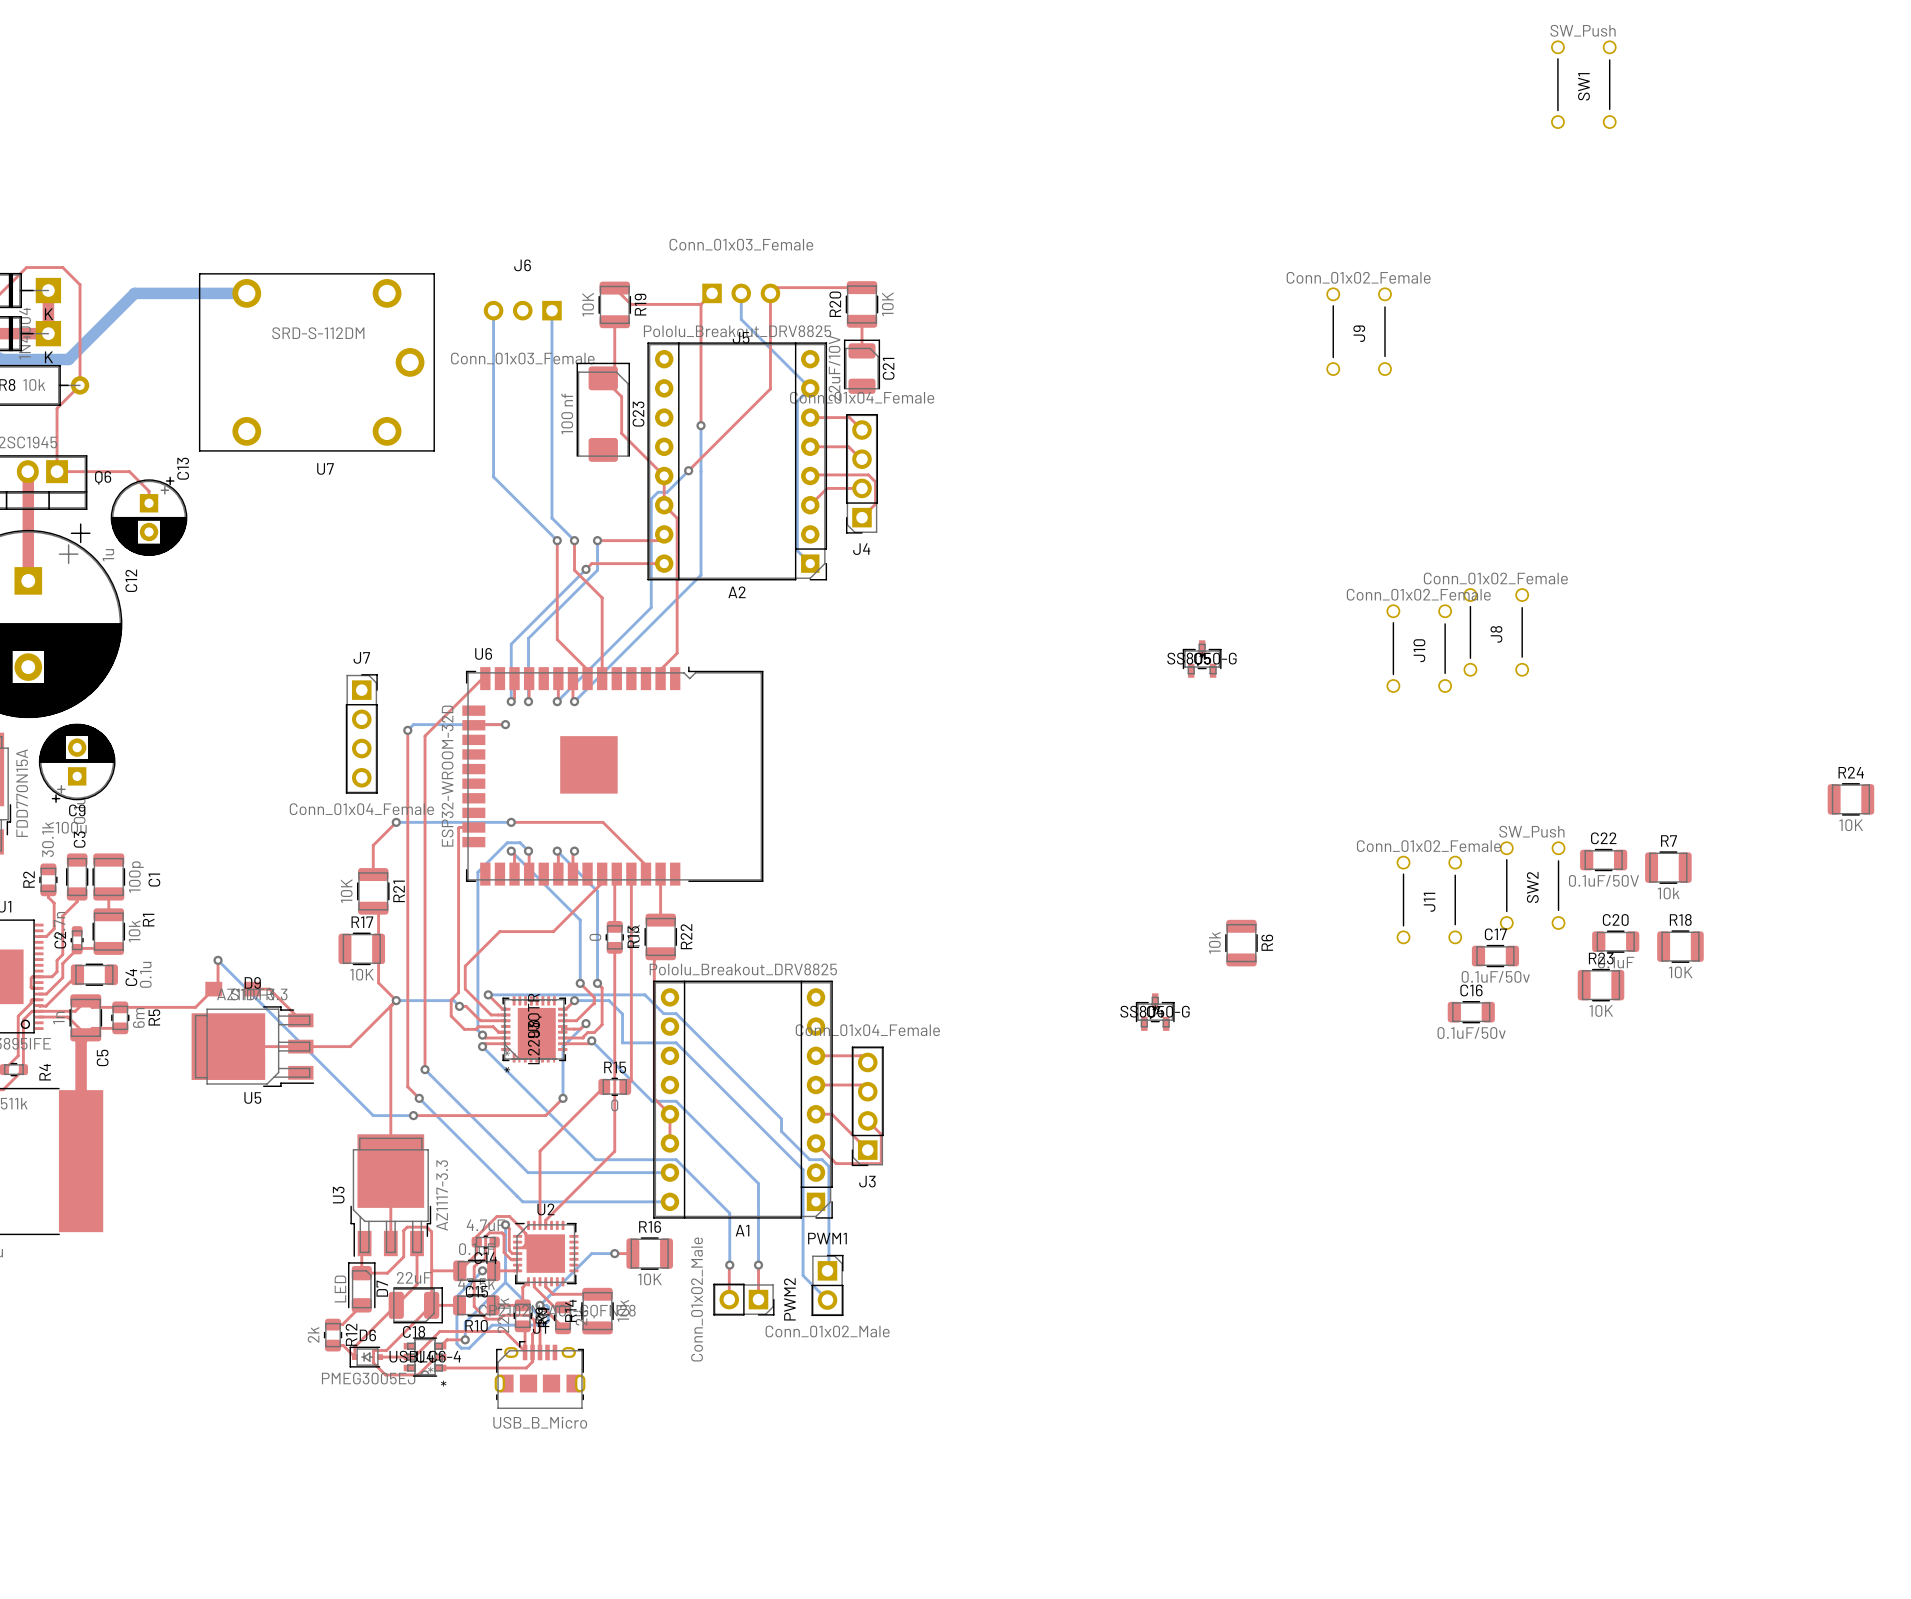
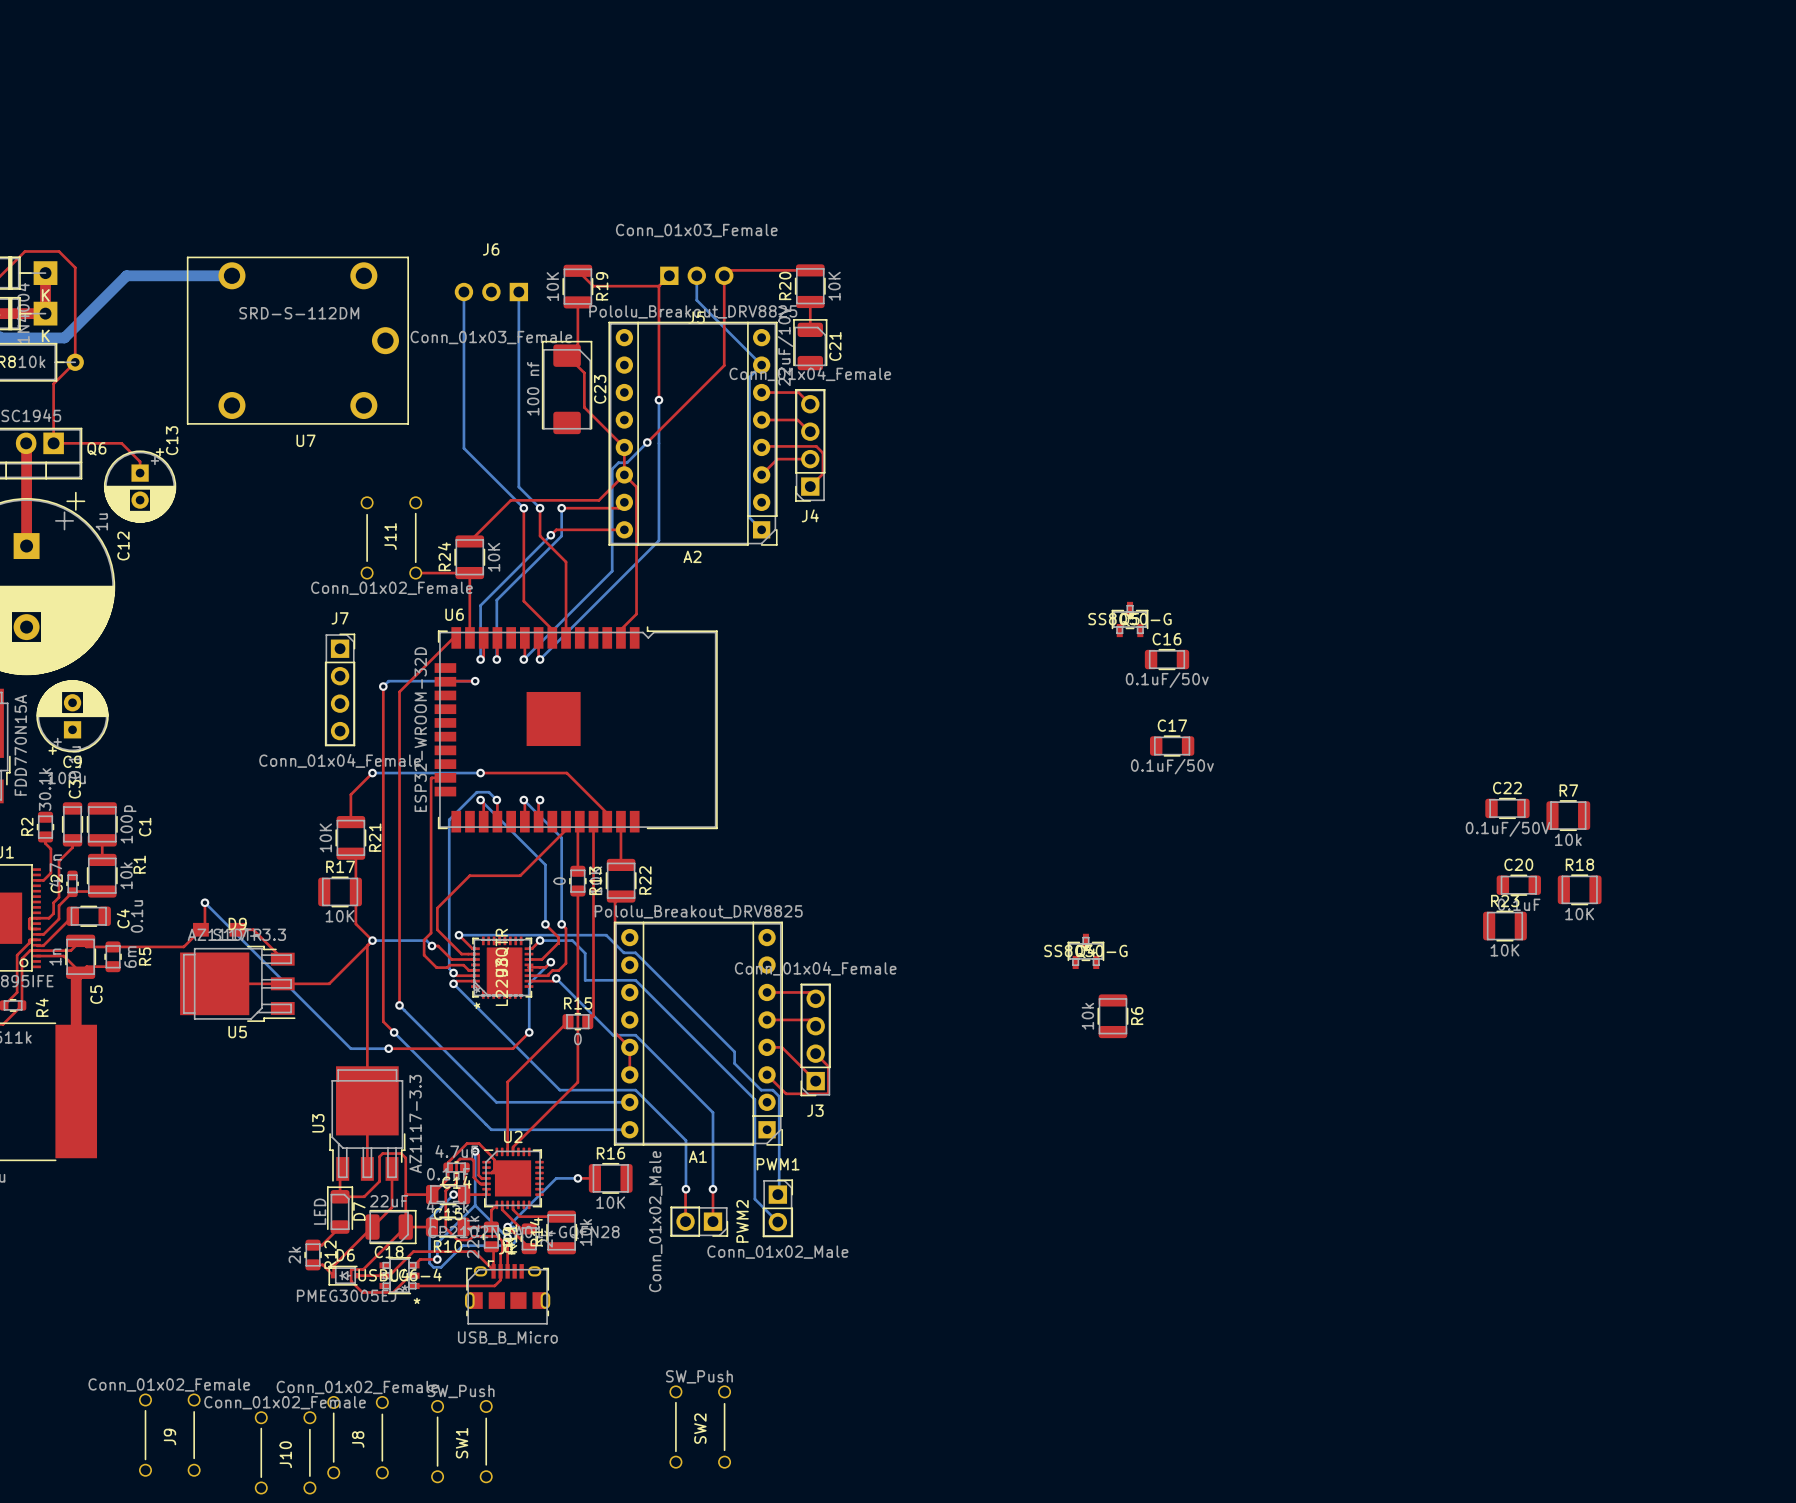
SW1 position: (1583, 84) -> (461, 1441)
J9 position: (1359, 331) -> (169, 1435)
top track: none -> (624, 474) (598, 500) (510, 500) (469, 541)
top track: none -> (415, 573) (469, 573) (469, 637)
J8 position: (1496, 632) -> (358, 1437)
J10 position: (1419, 648) -> (285, 1452)
R24 name position: R24 (1851, 772) -> R24 (444, 556)
R24 rotation: 0° (1850, 799) -> 90° clockwise (469, 557)
R24 position: (1850, 799) -> (469, 557)
R24 value position: 10K (1851, 825) -> 10K (494, 557)
SW2 position: (1532, 885) -> (700, 1427)
J11 rotation: 0° (1429, 899) -> 180° (391, 537)
J11 position: (1429, 899) -> (391, 537)
R6 position: (1241, 943) -> (1112, 1016)
C17 position: (1495, 956) -> (1172, 746)
C16 position: (1471, 1012) -> (1167, 659)

